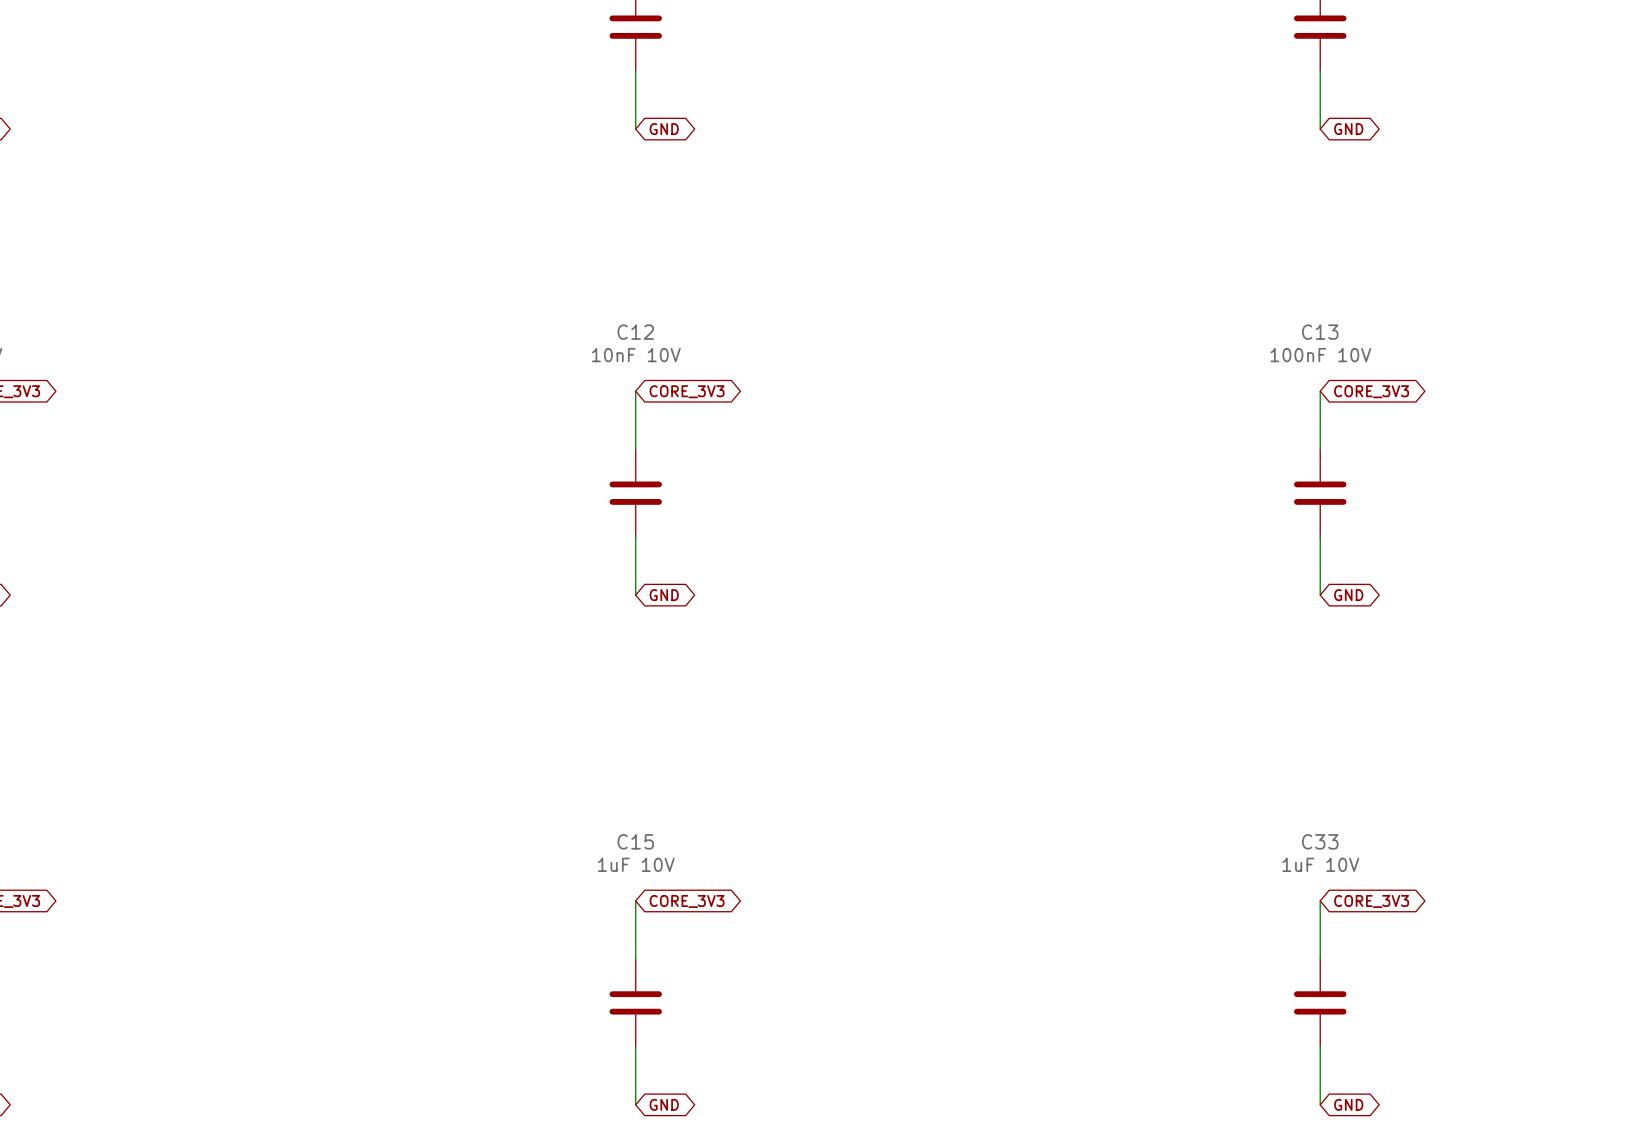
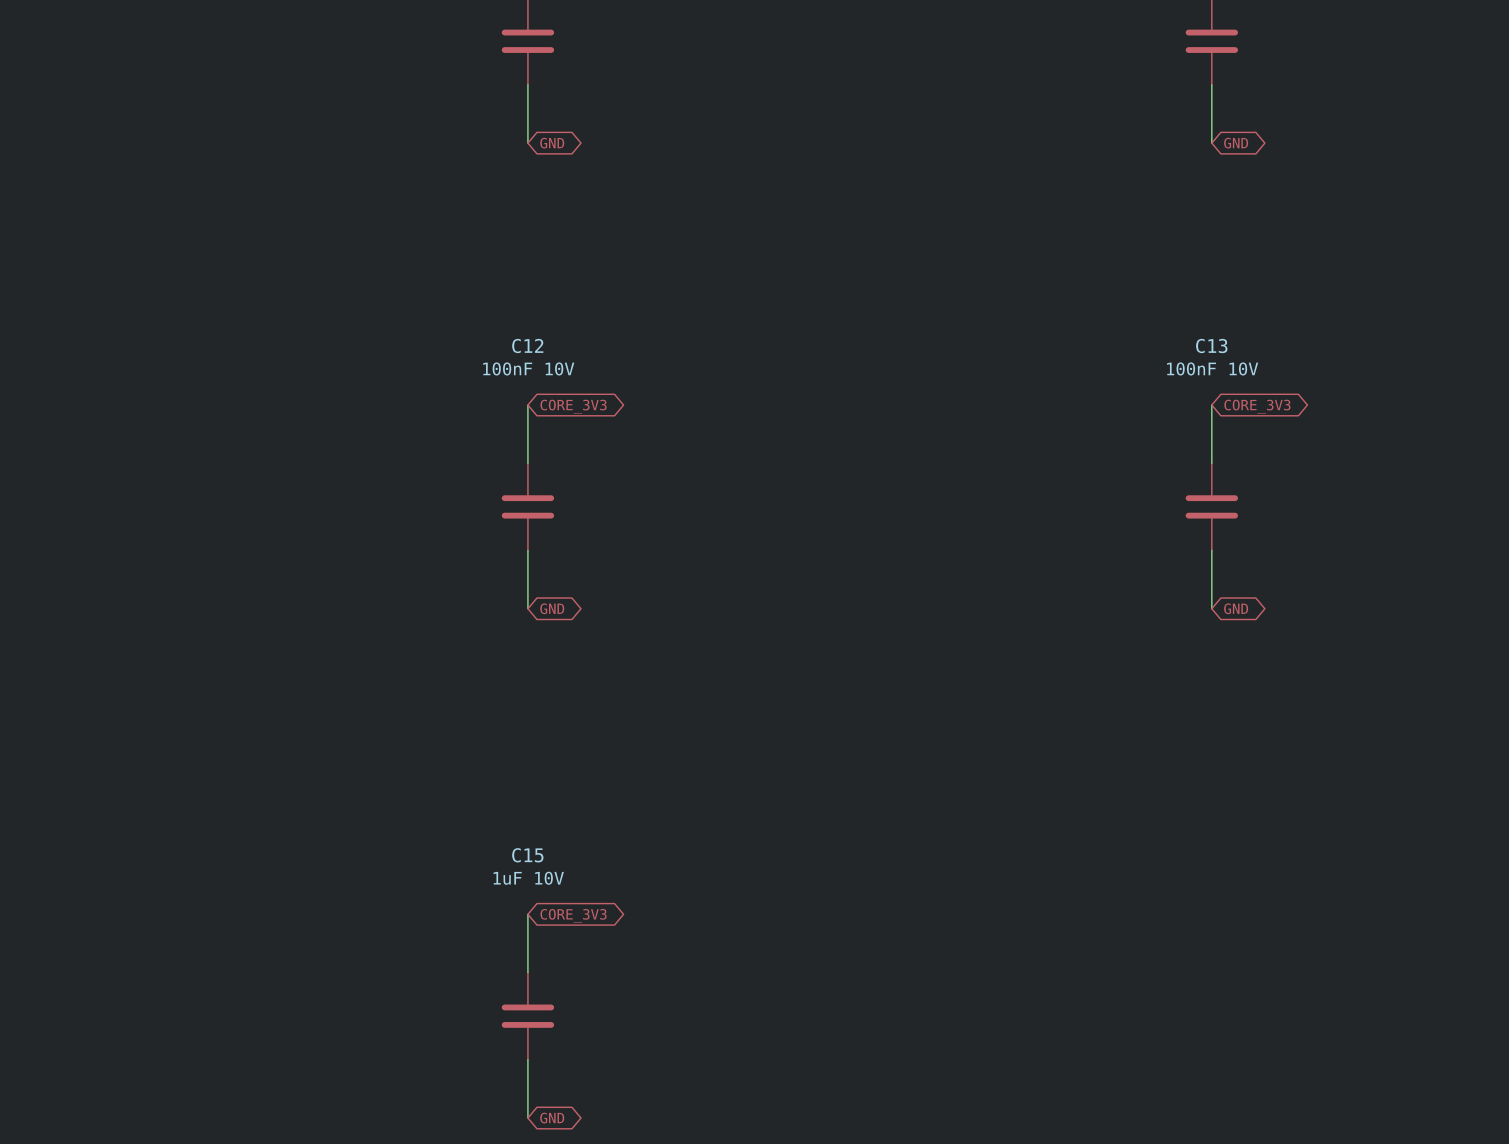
C12 value: 10nF 10V (636, 355) -> 100nF 10V (528, 368)
wire: (1320, 900) (1320, 959) -> none
global label: CORE_3V3 (1371, 901) -> none
C33: 1uF 10V (1320, 1002) -> none
wire: (1320, 1046) (1320, 1104) -> none
global label: GND (1348, 1104) -> none

